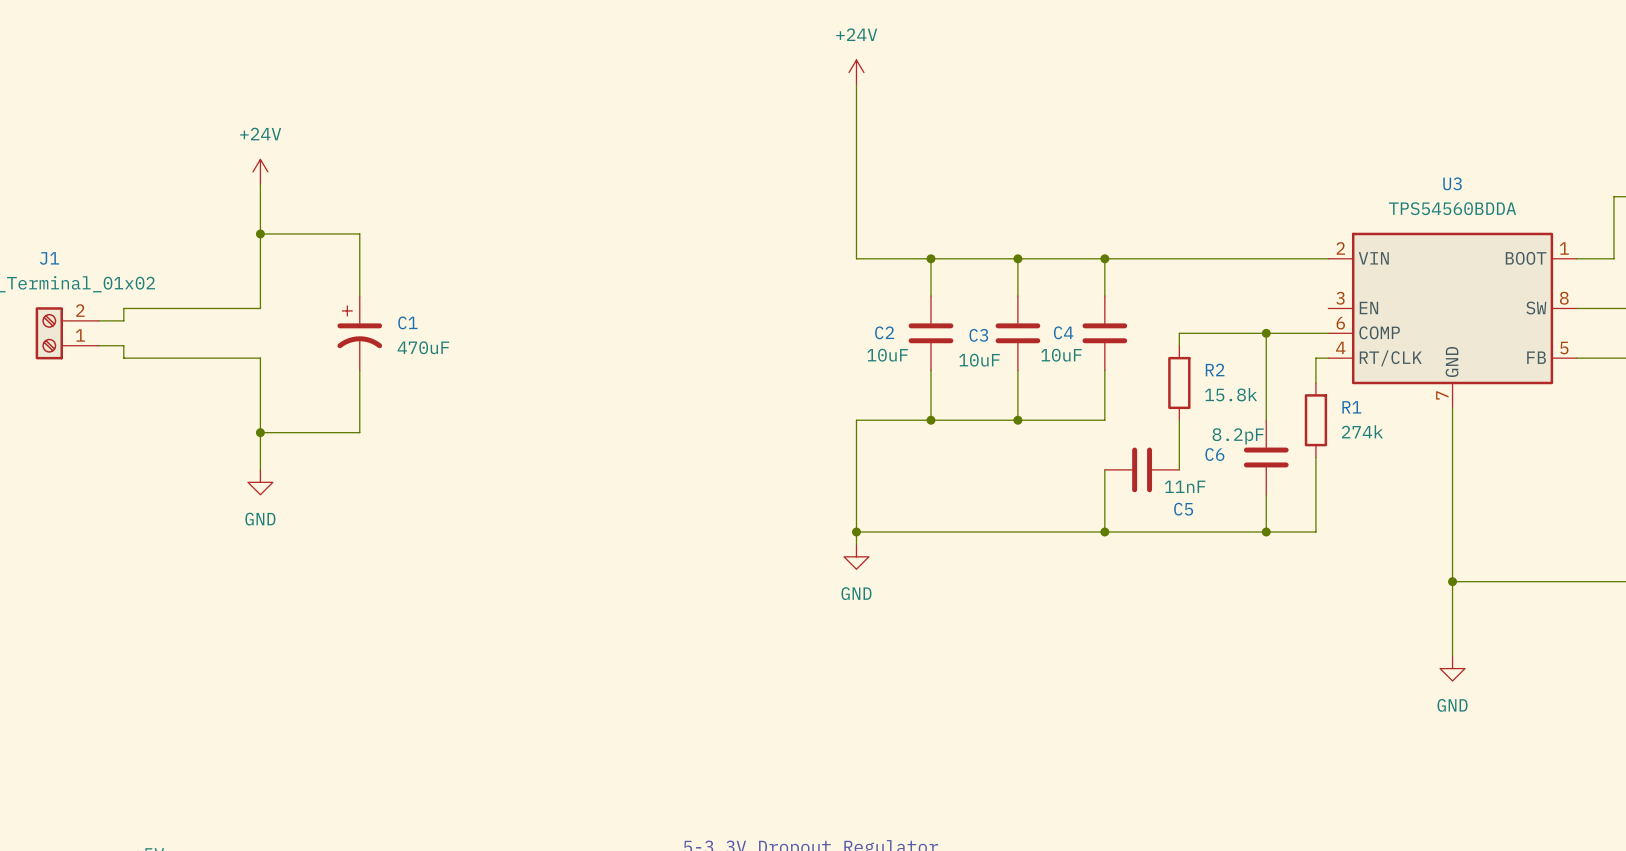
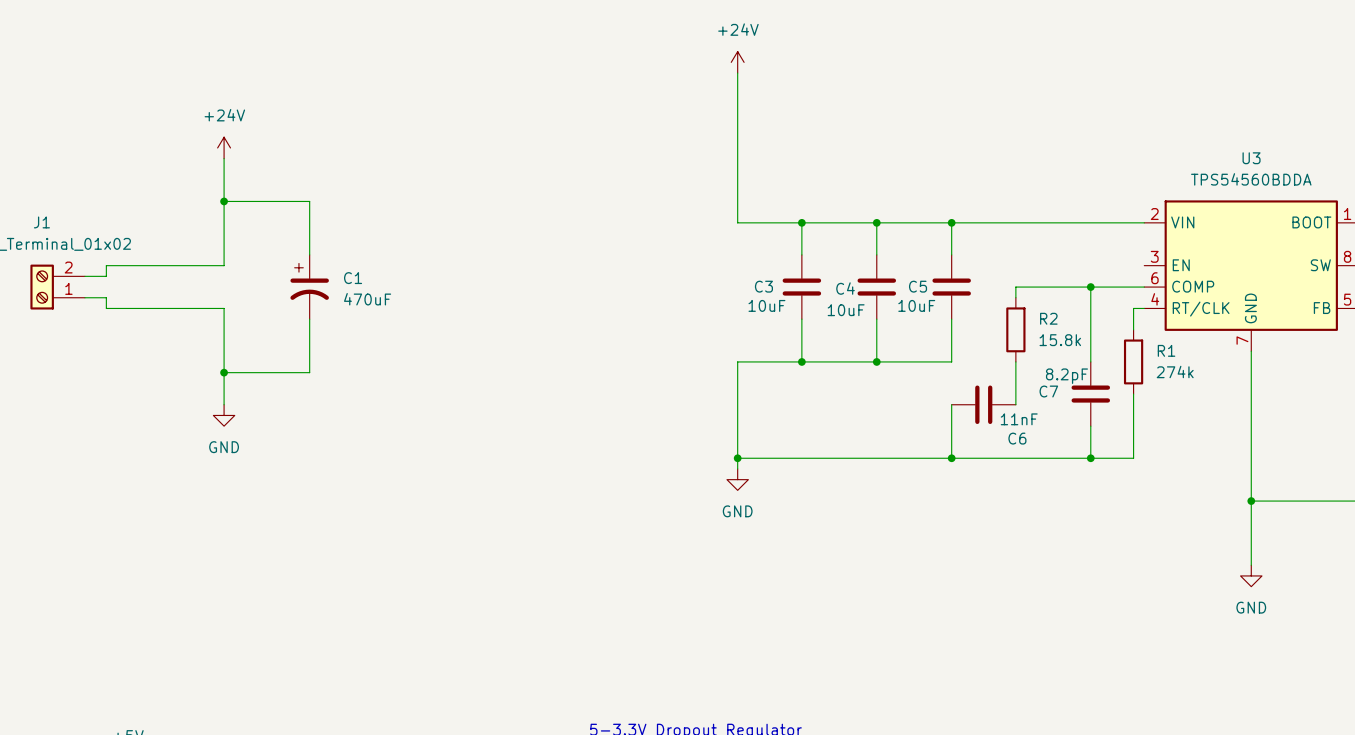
C2 name: C2 (884, 332) -> C3 (763, 286)
C4 name: C4 (1063, 332) -> C5 (918, 286)
C3 name: C3 (978, 335) -> C4 (845, 288)
C6 name: C6 (1214, 454) -> C7 (1048, 391)
C5 name: C5 (1183, 509) -> C6 (1017, 438)

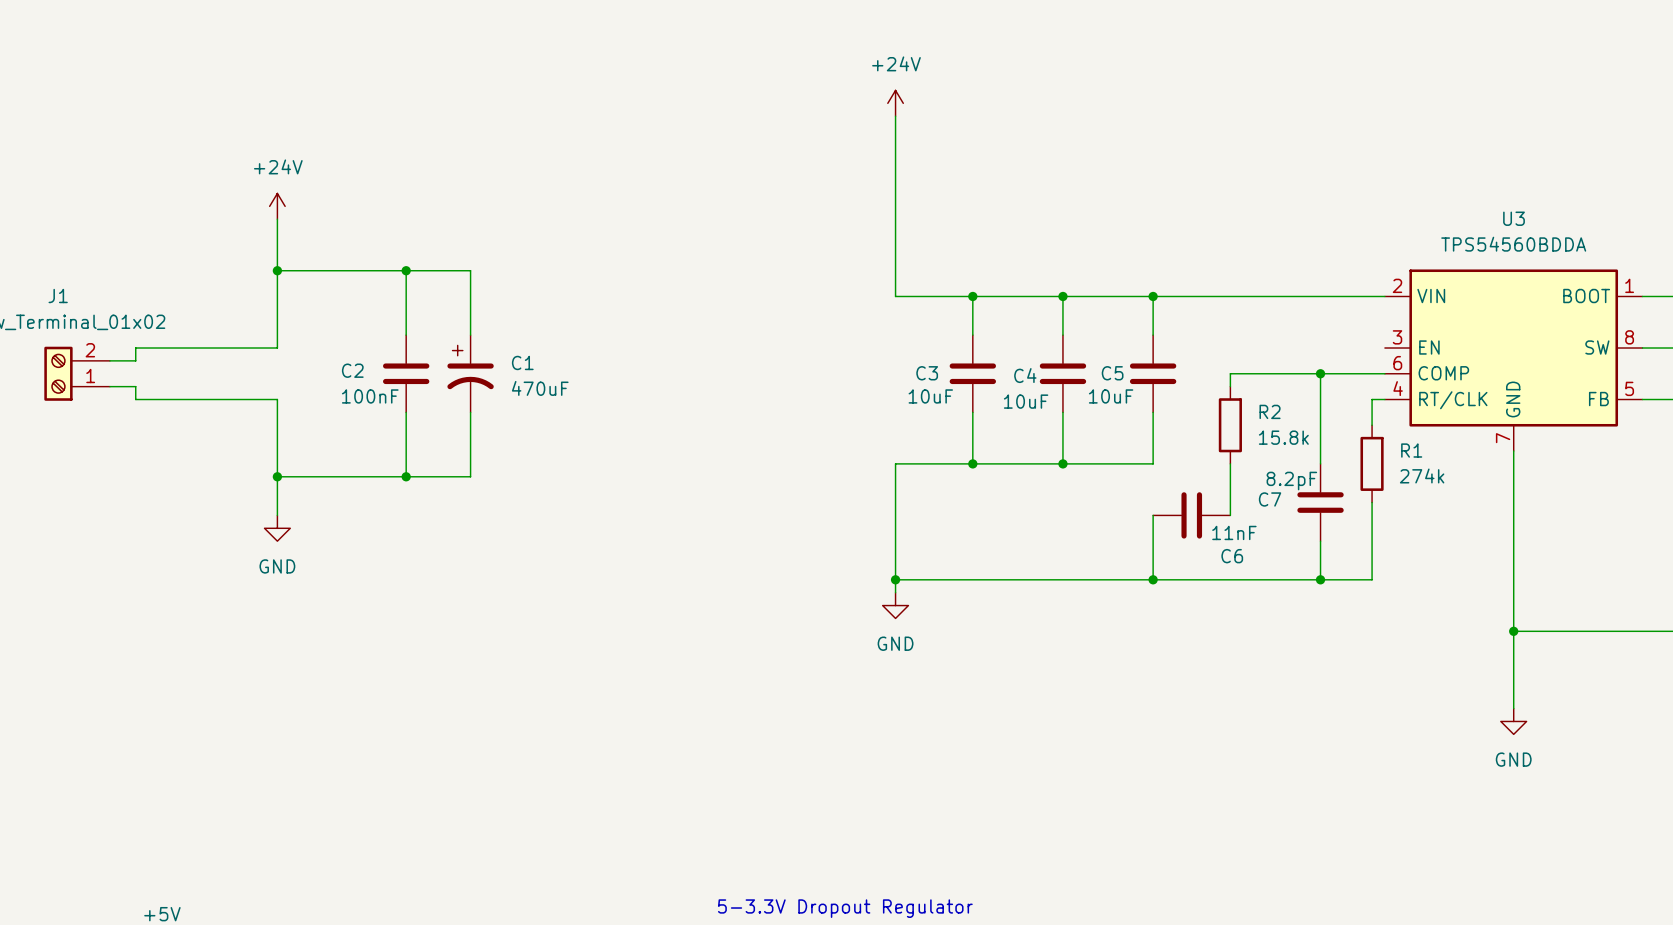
wire: (309, 201) (309, 254) -> (380, 270) (470, 270) (470, 335)
wire: none -> (406, 270) (406, 335)
junction: none -> (406, 270)
C1 position: (309, 287) -> (470, 373)
C2: none -> 100nF (406, 373)
wire: (309, 319) (309, 372) -> (470, 412) (470, 476) (380, 476)
wire: none -> (406, 412) (406, 476)
junction: none -> (406, 476)

